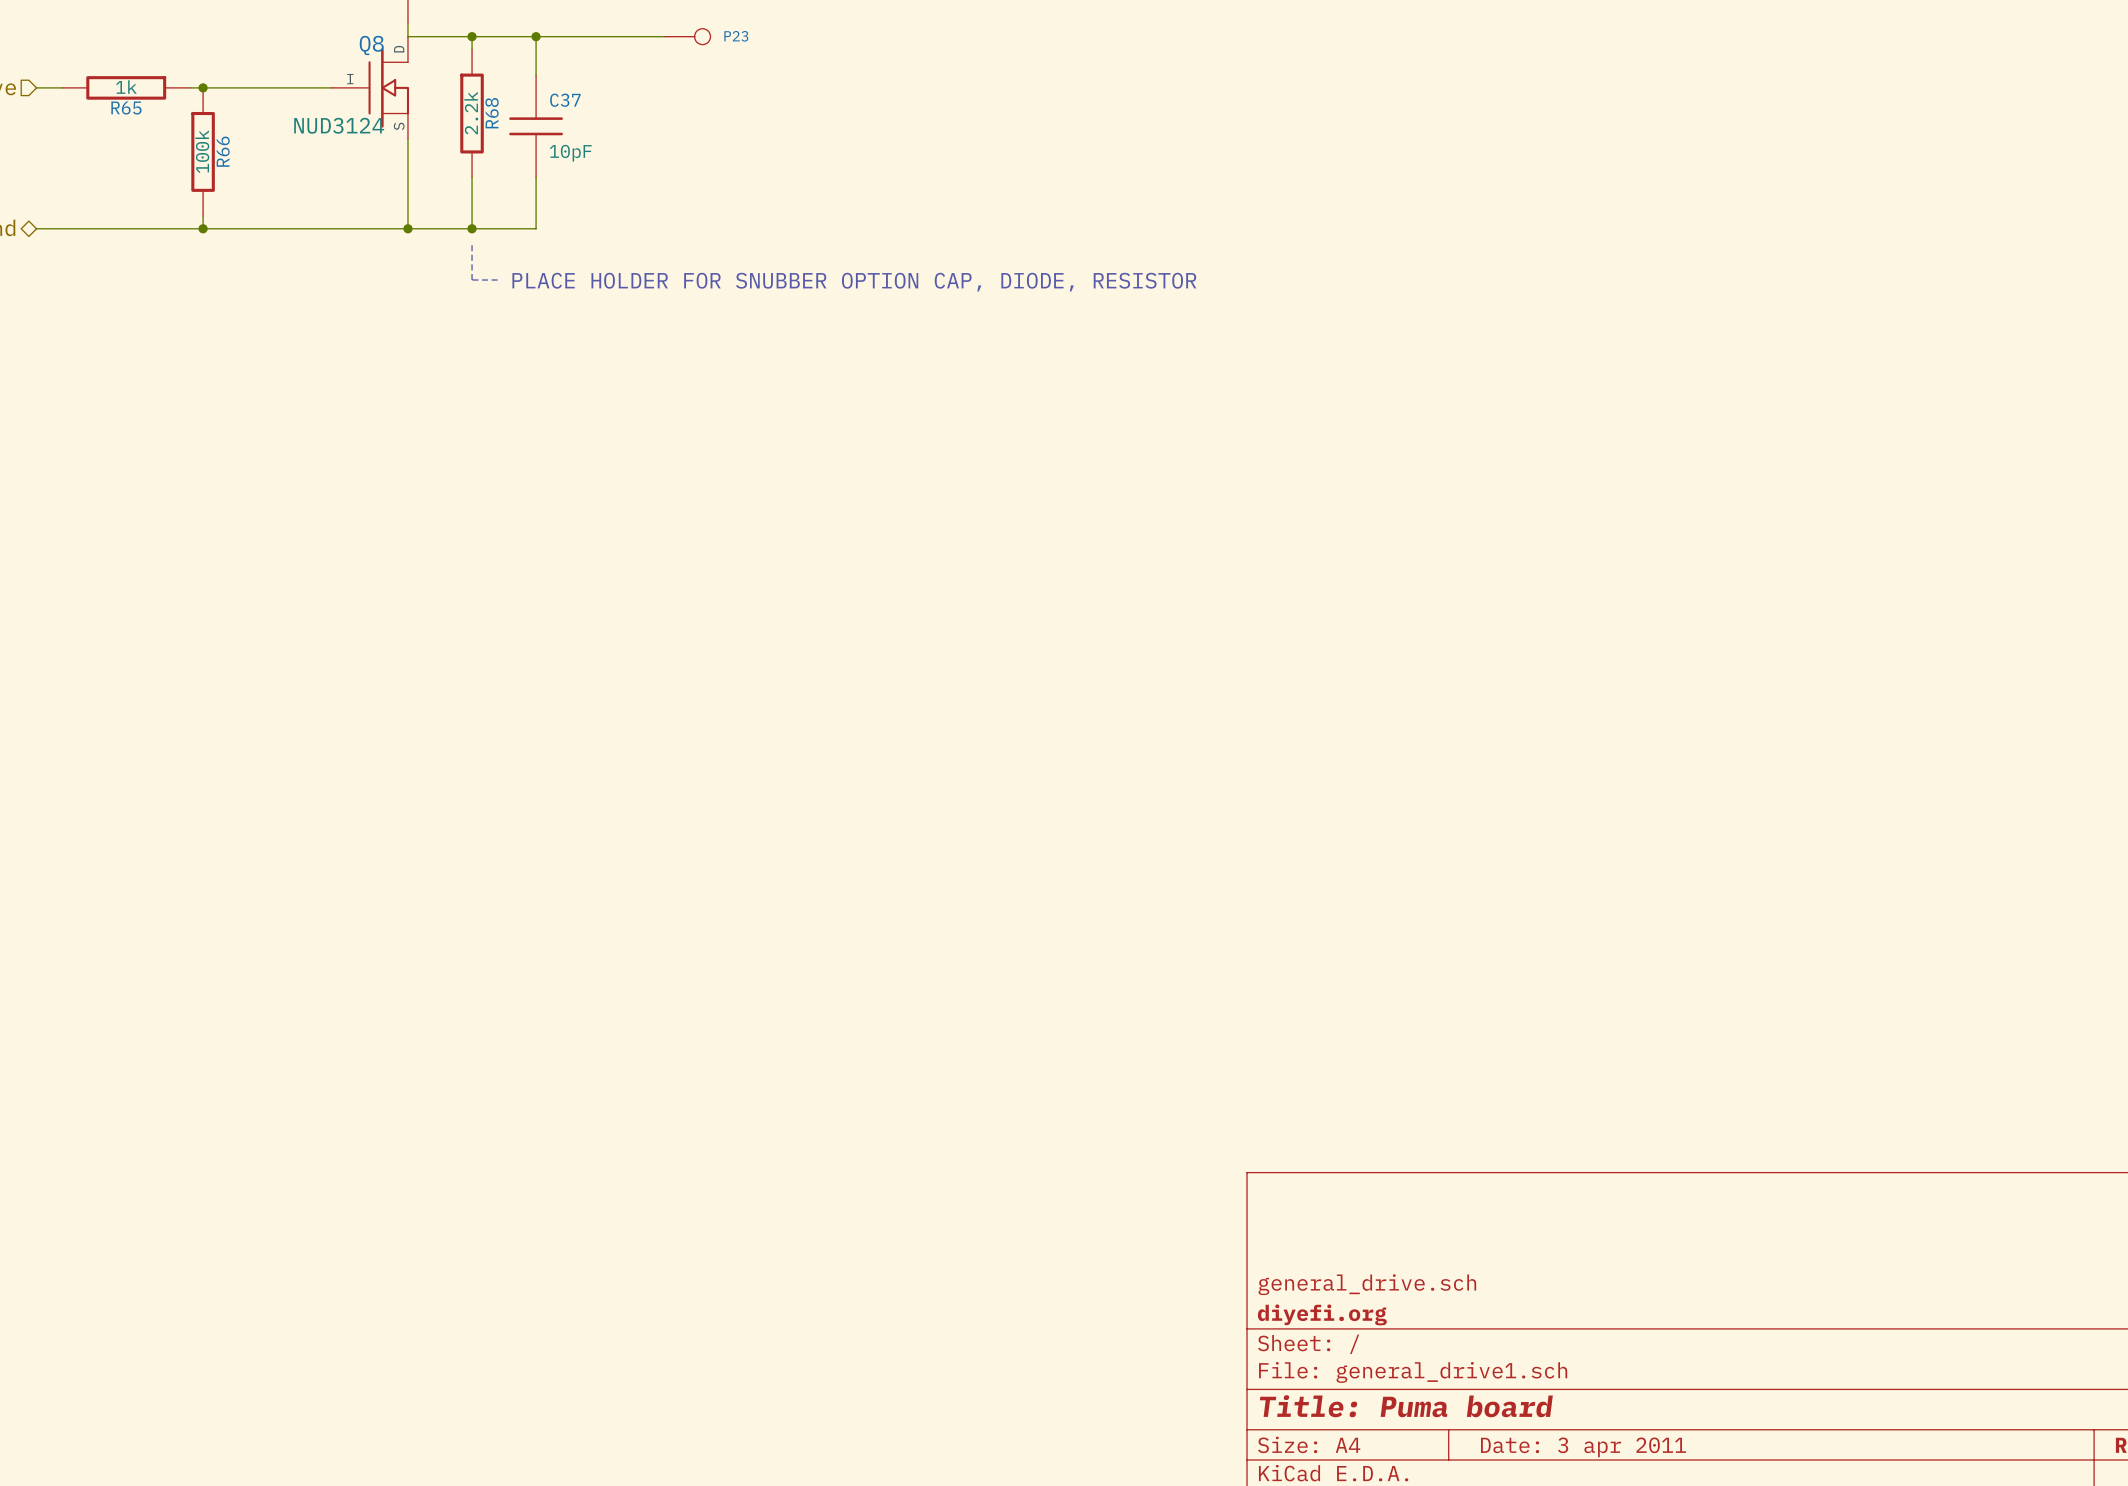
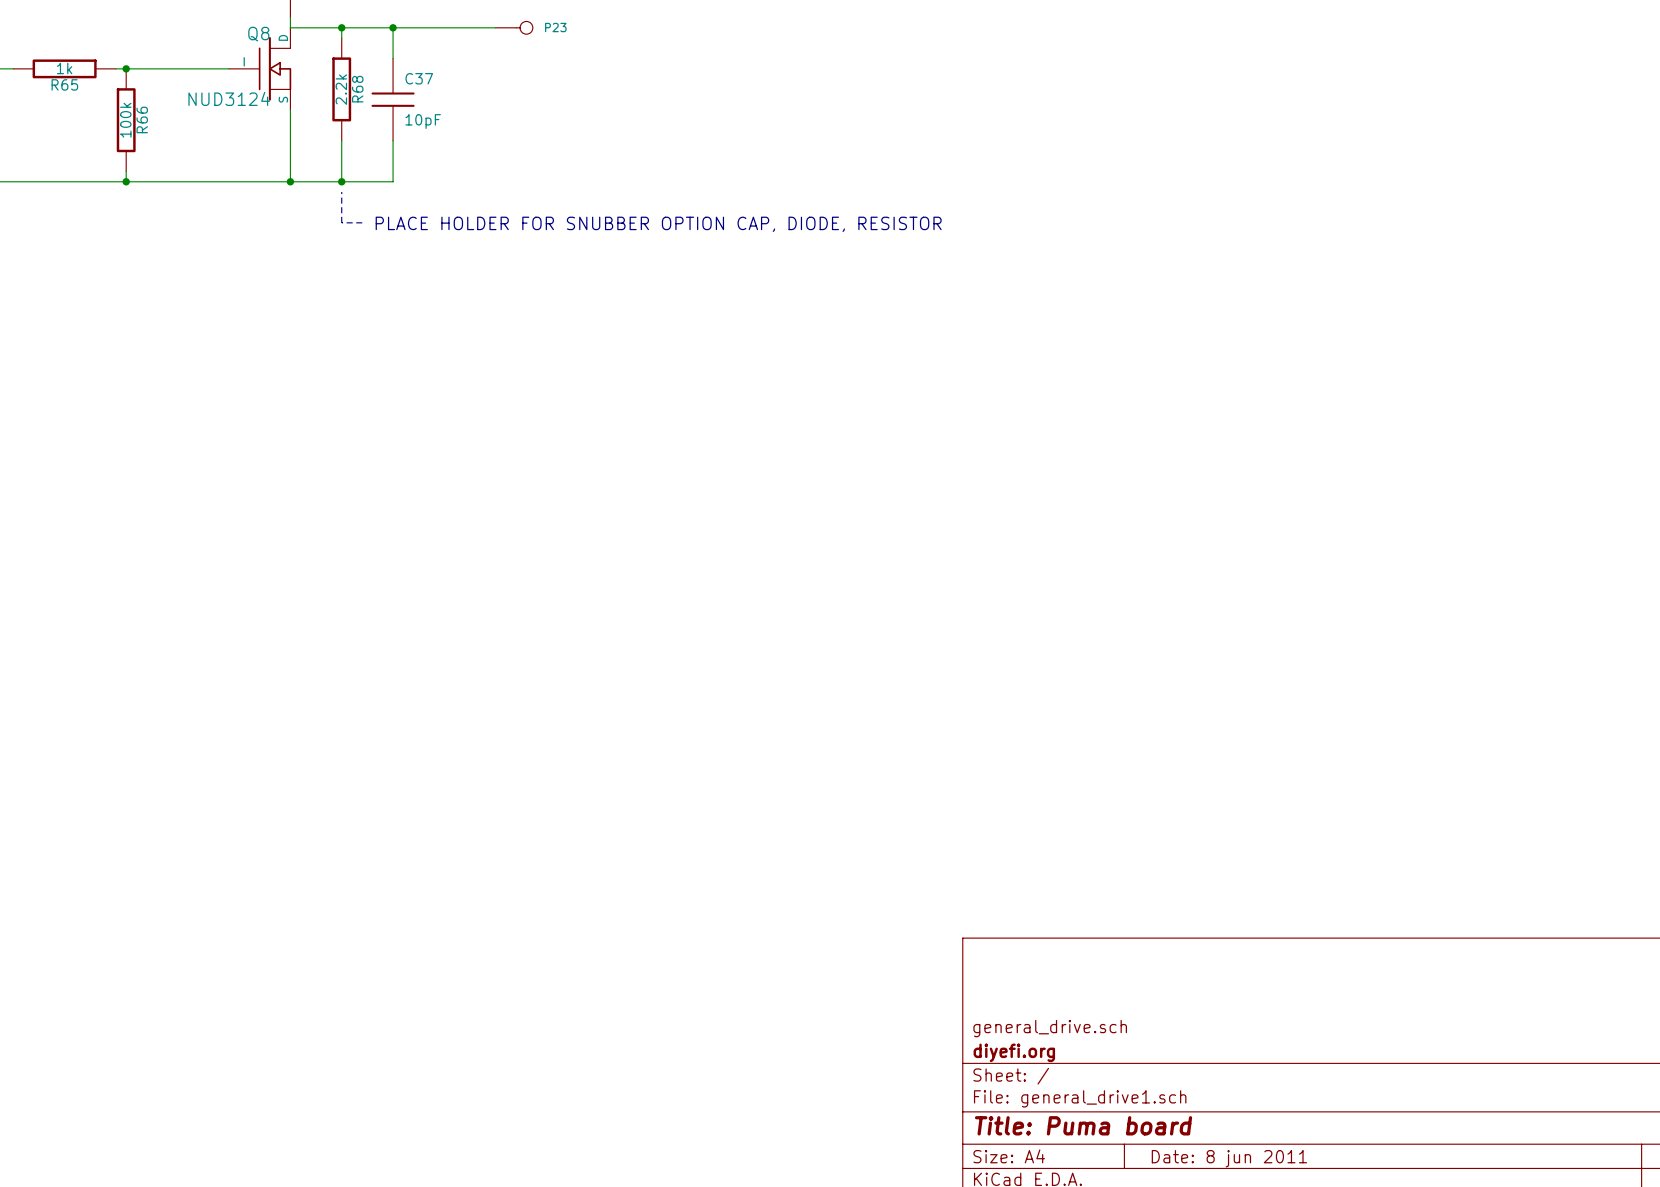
title block: Date: 3 apr 2011 (1583, 1447) -> Date: 8 jun 2011 (1229, 1158)

